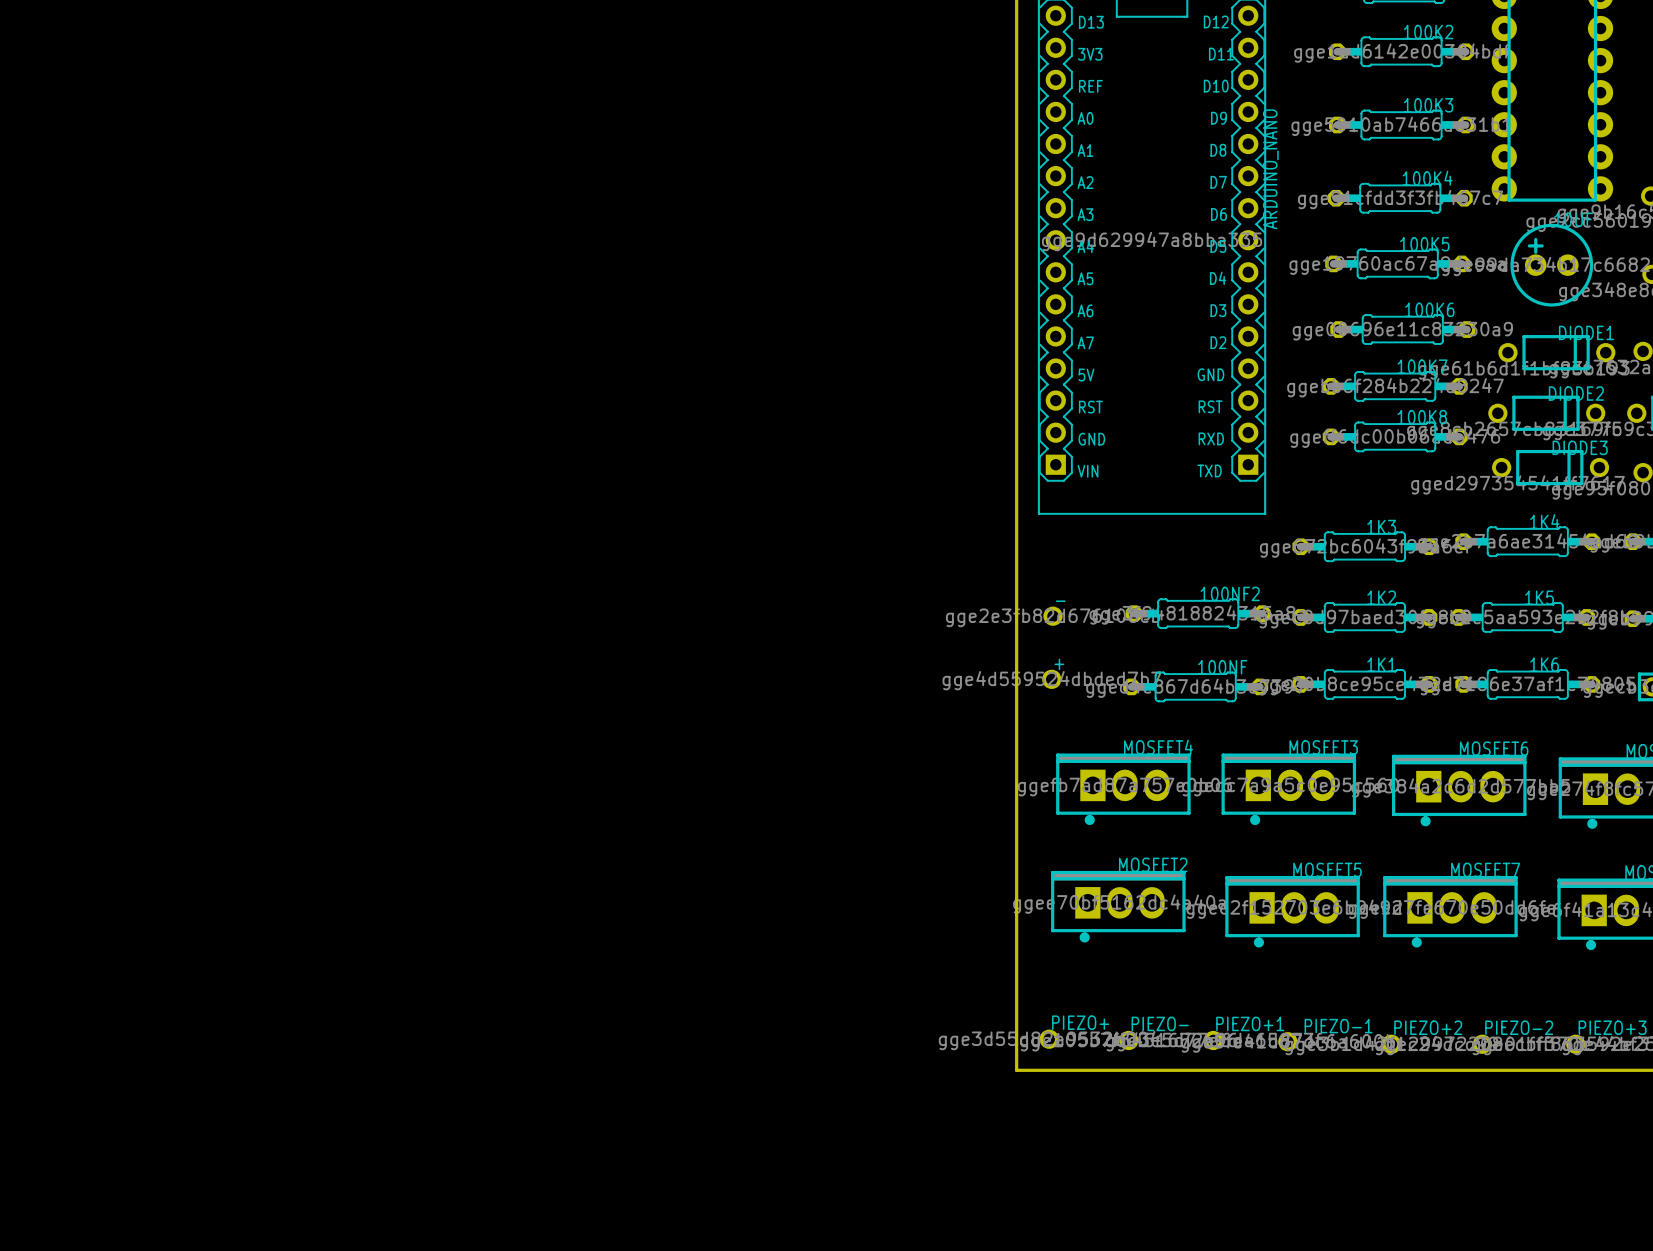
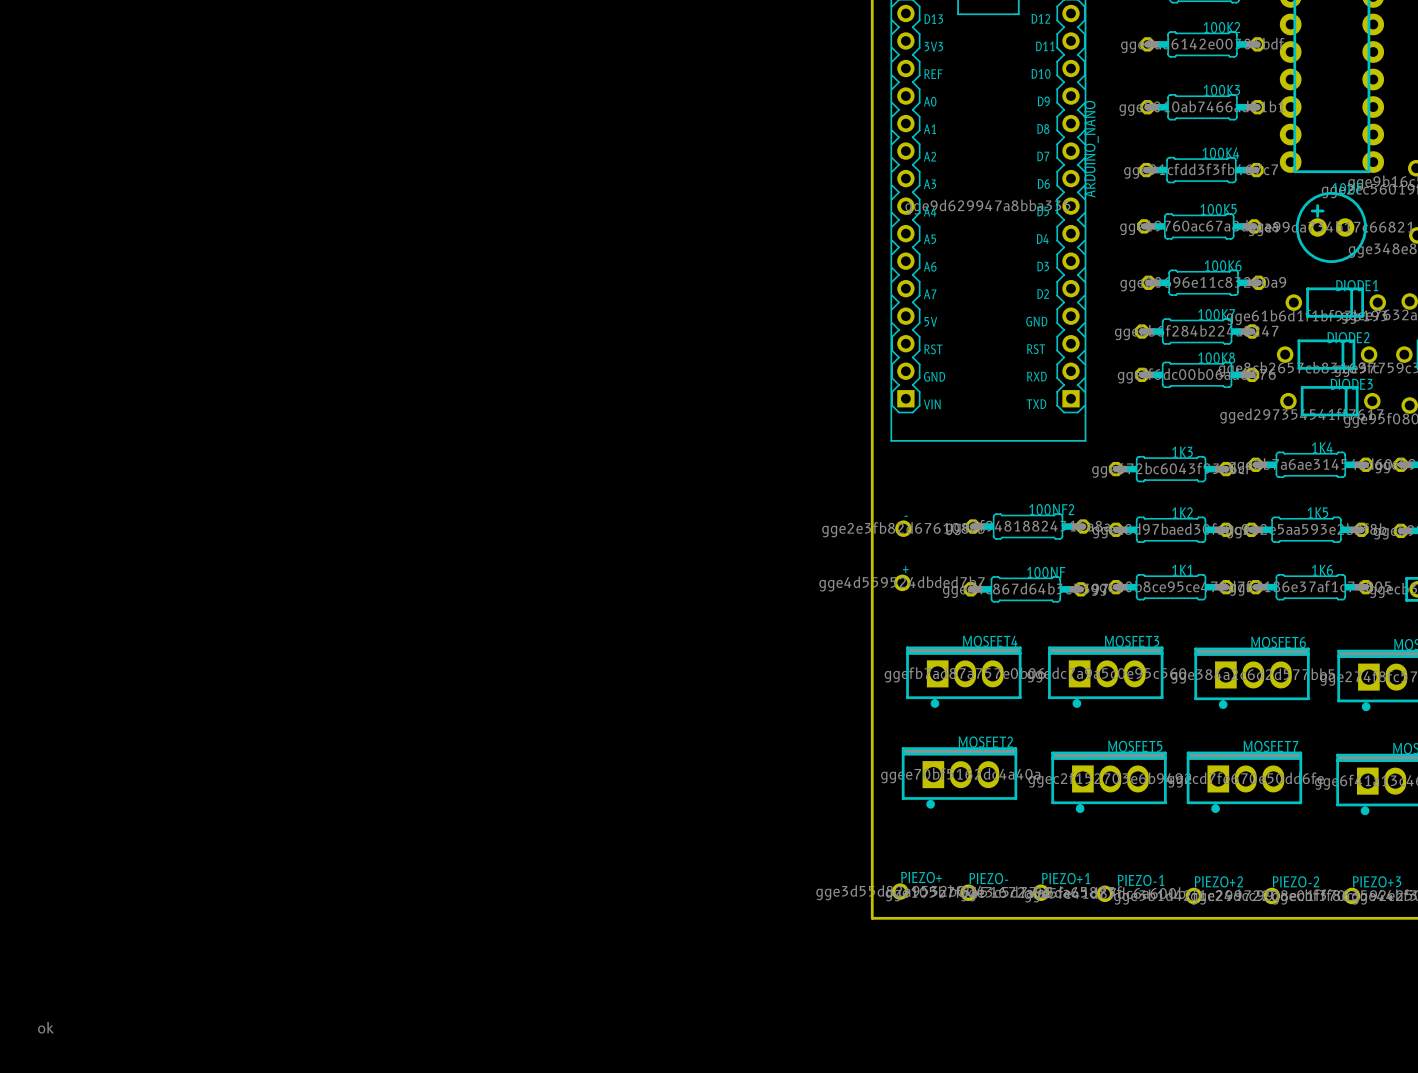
text: none -> ok (45, 1027)

